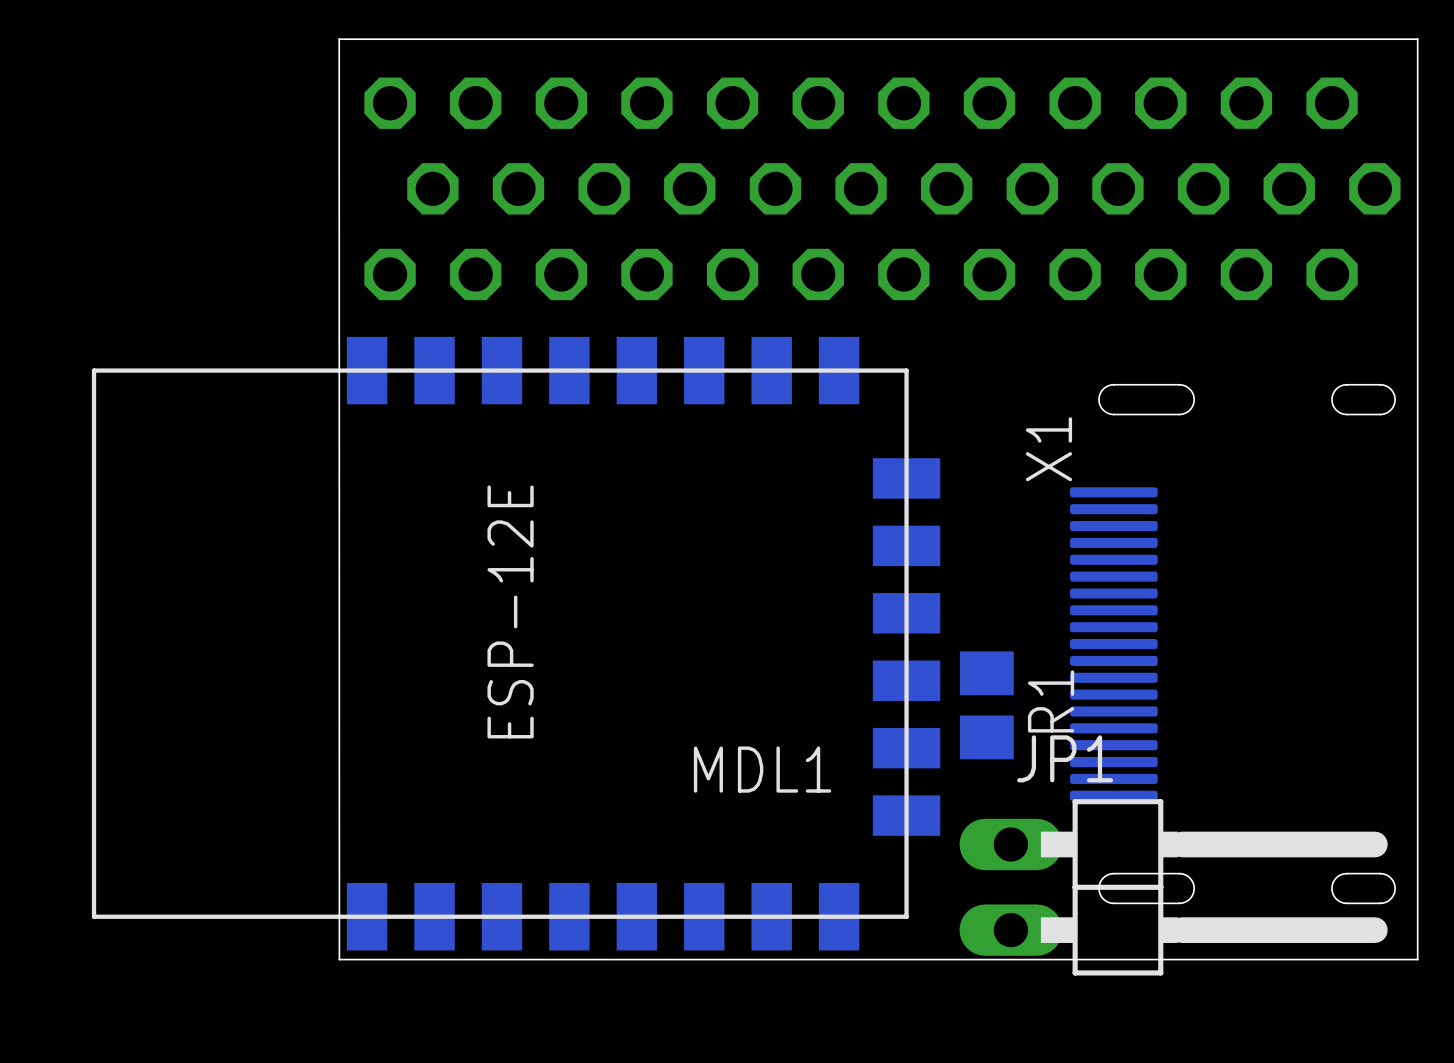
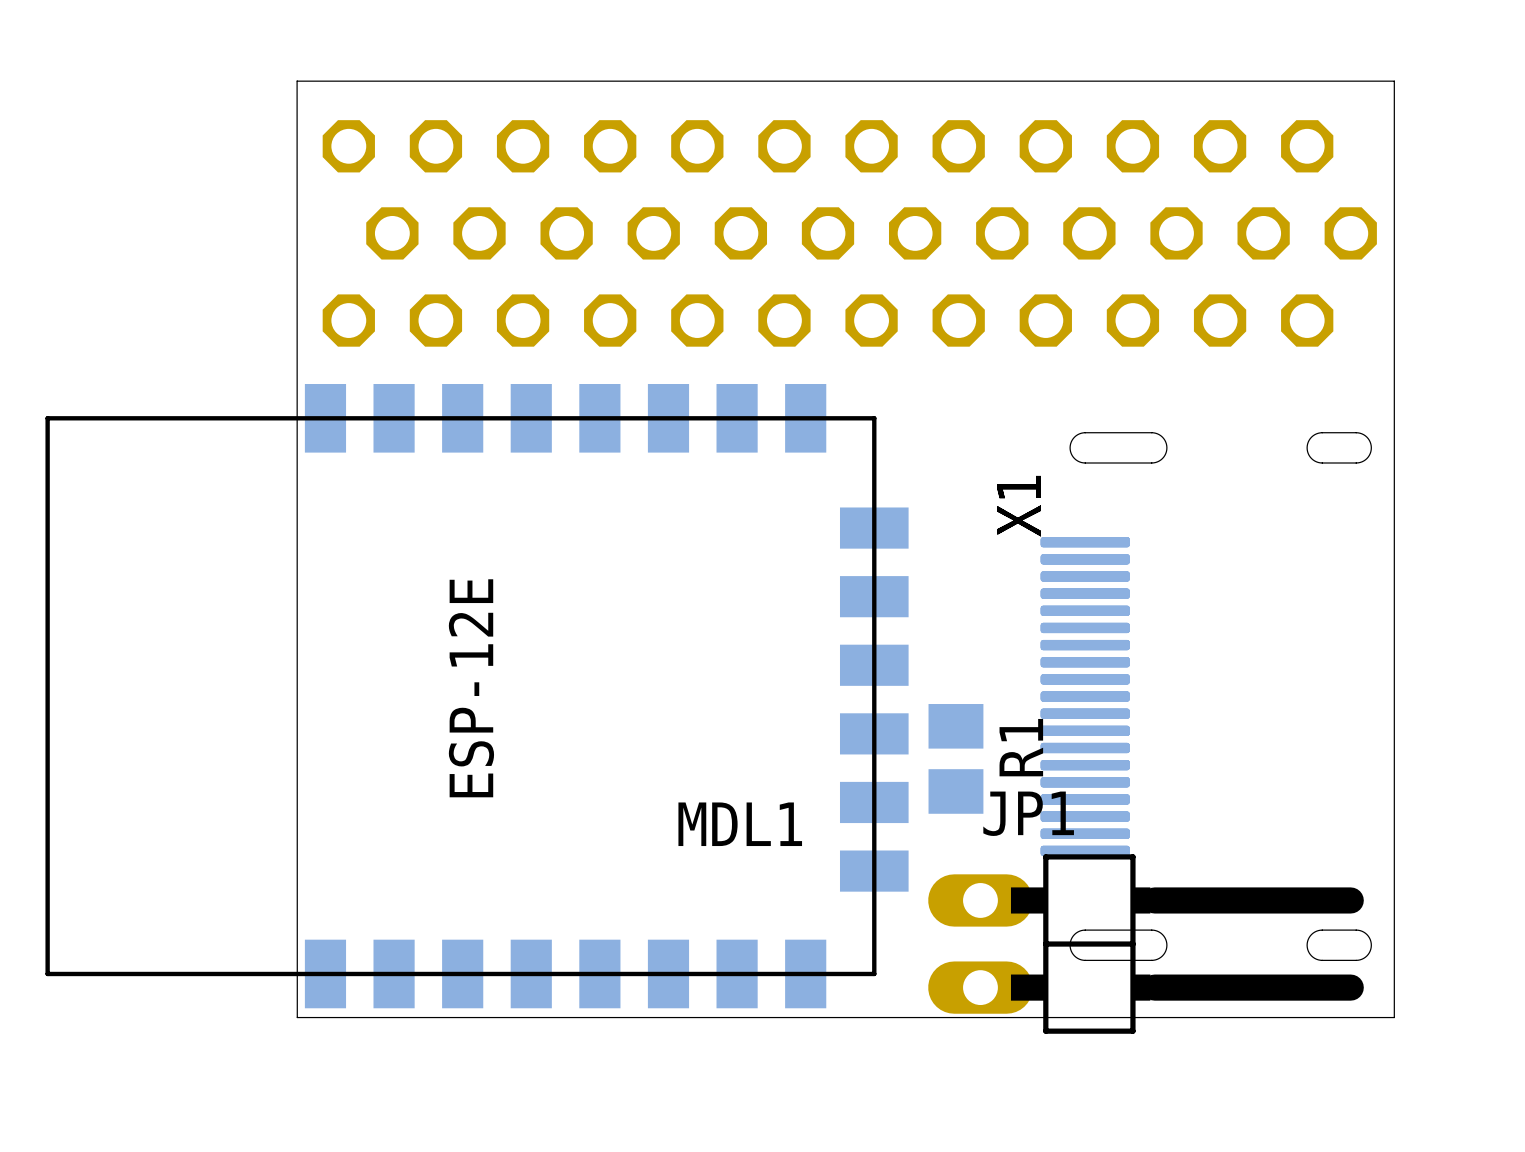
part: none -> (1085, 696)

